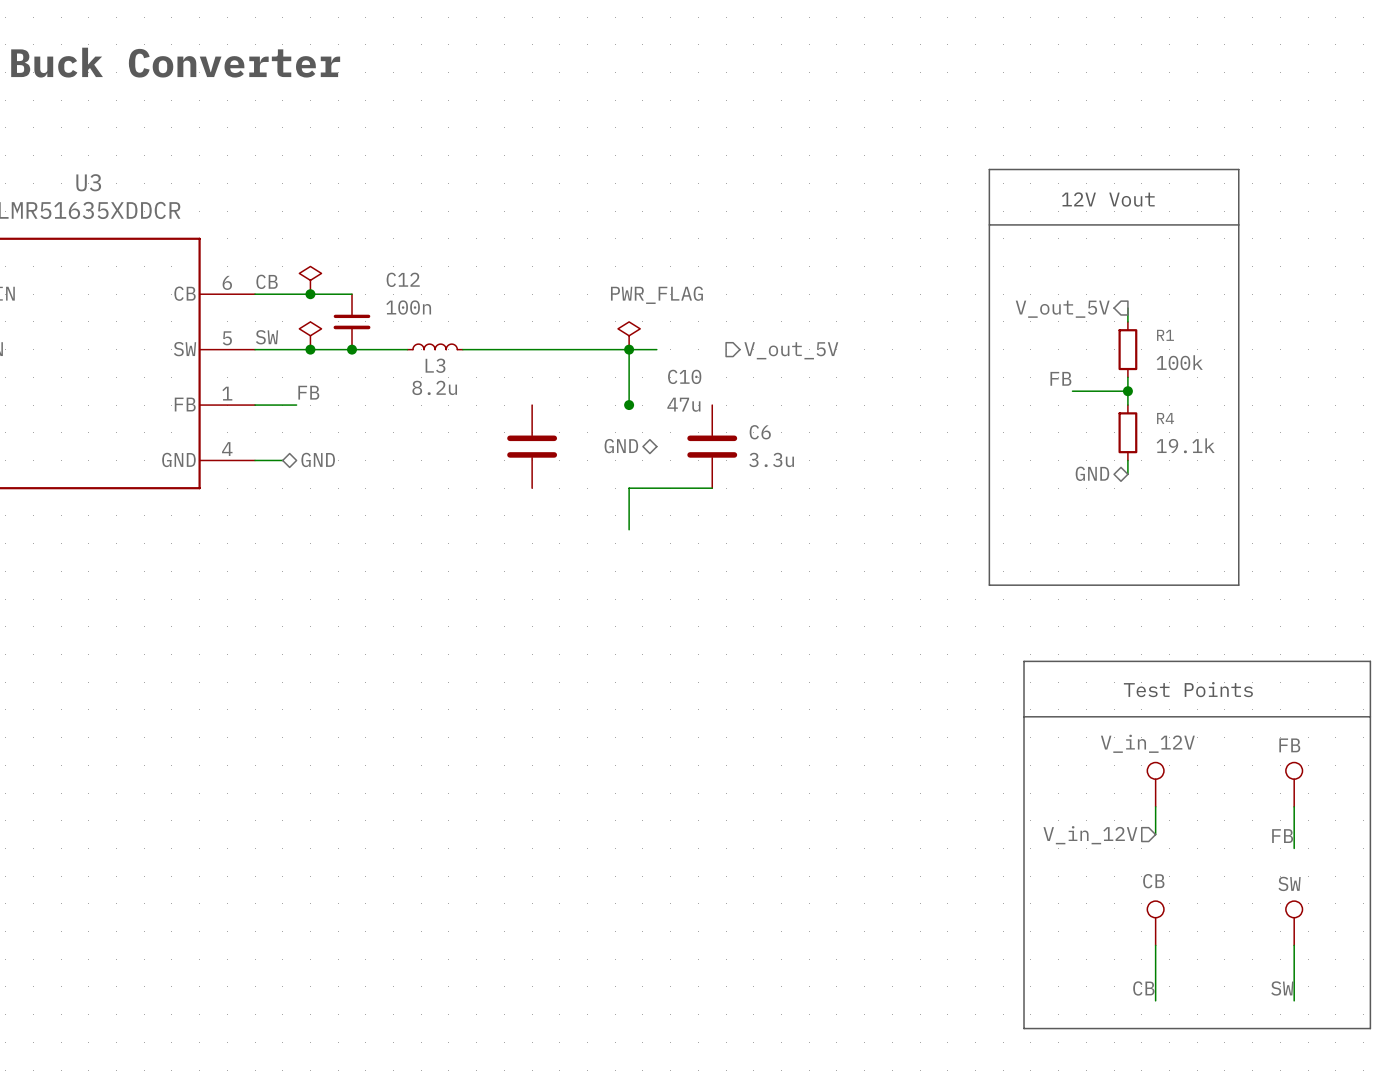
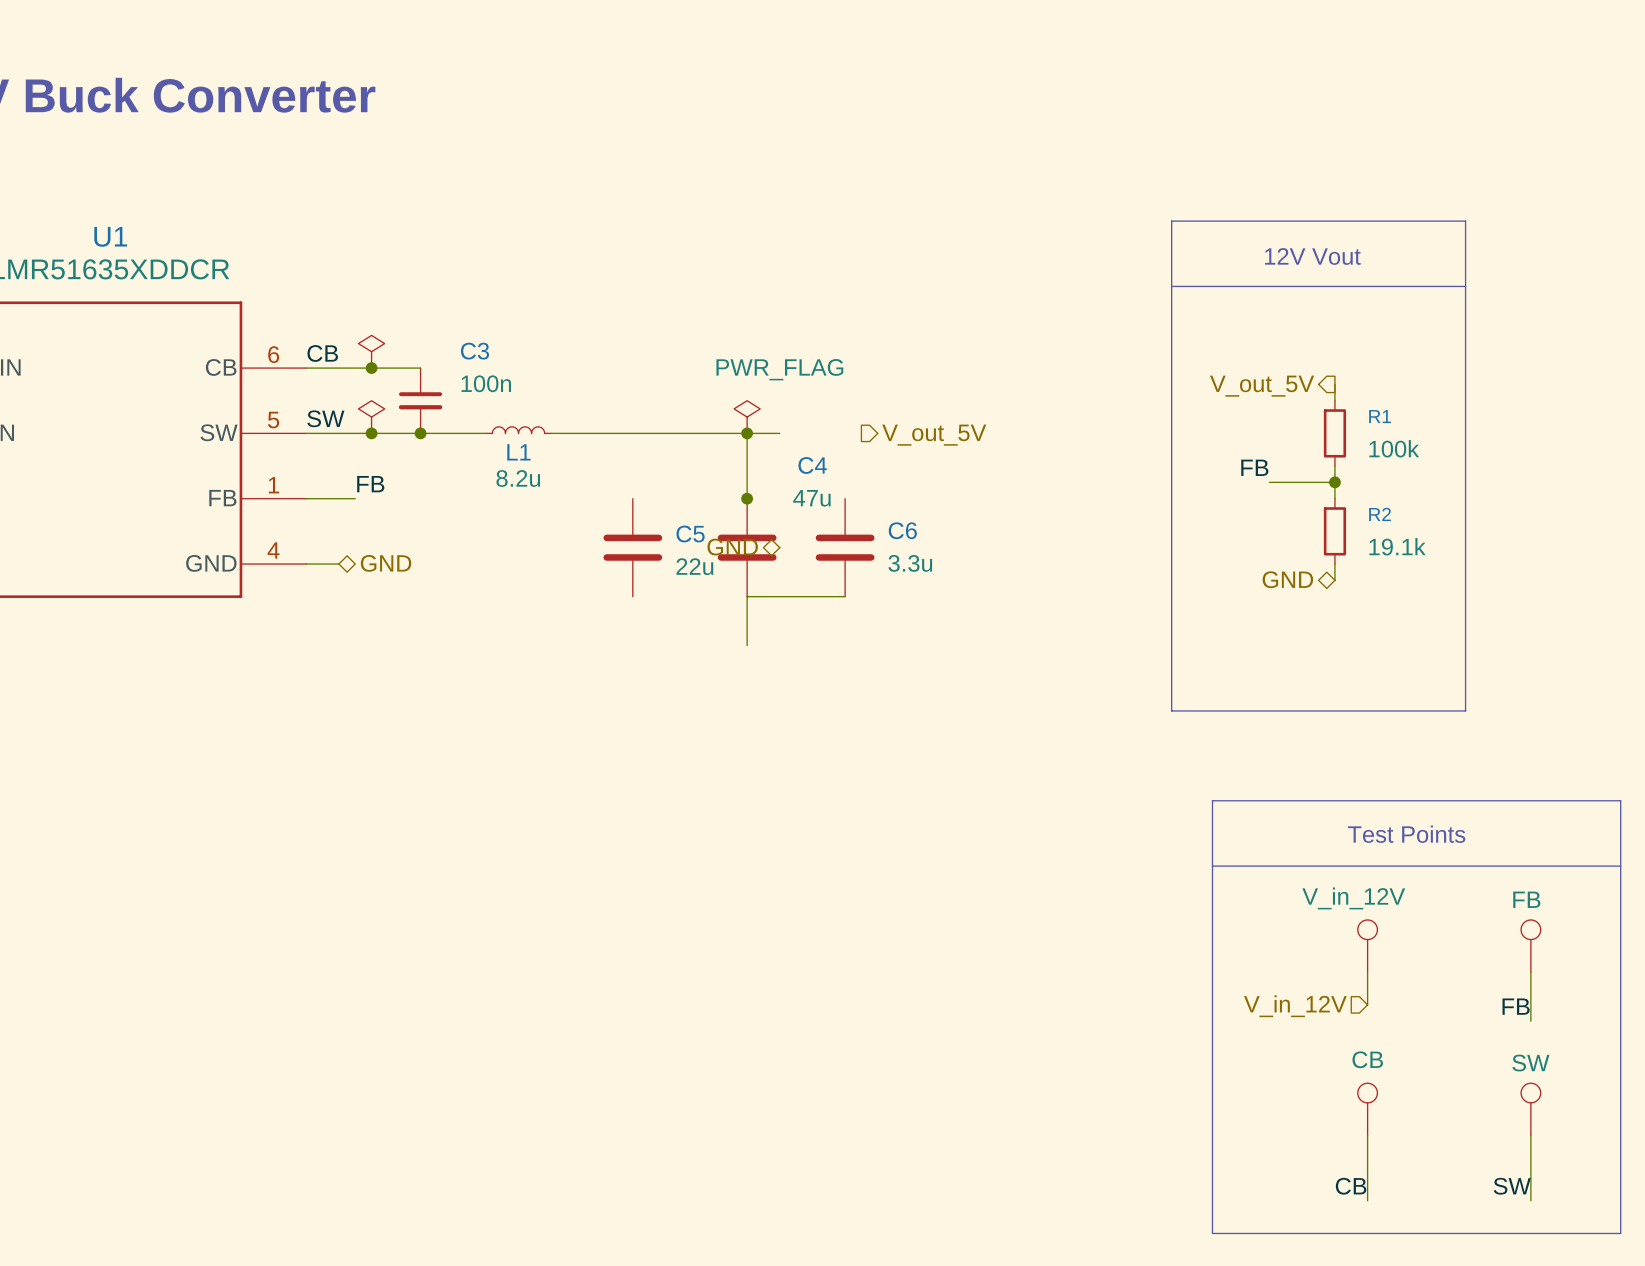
U3 name: U3 (88, 182) -> U1 (110, 236)
C12 name: C12 (403, 279) -> C3 (475, 351)
L3 name: L3 (435, 365) -> L1 (518, 452)
C10 name: C10 (684, 376) -> C4 (812, 465)
R4 name: R4 (1165, 418) -> R2 (1380, 514)
C5: none -> 22u (747, 547)

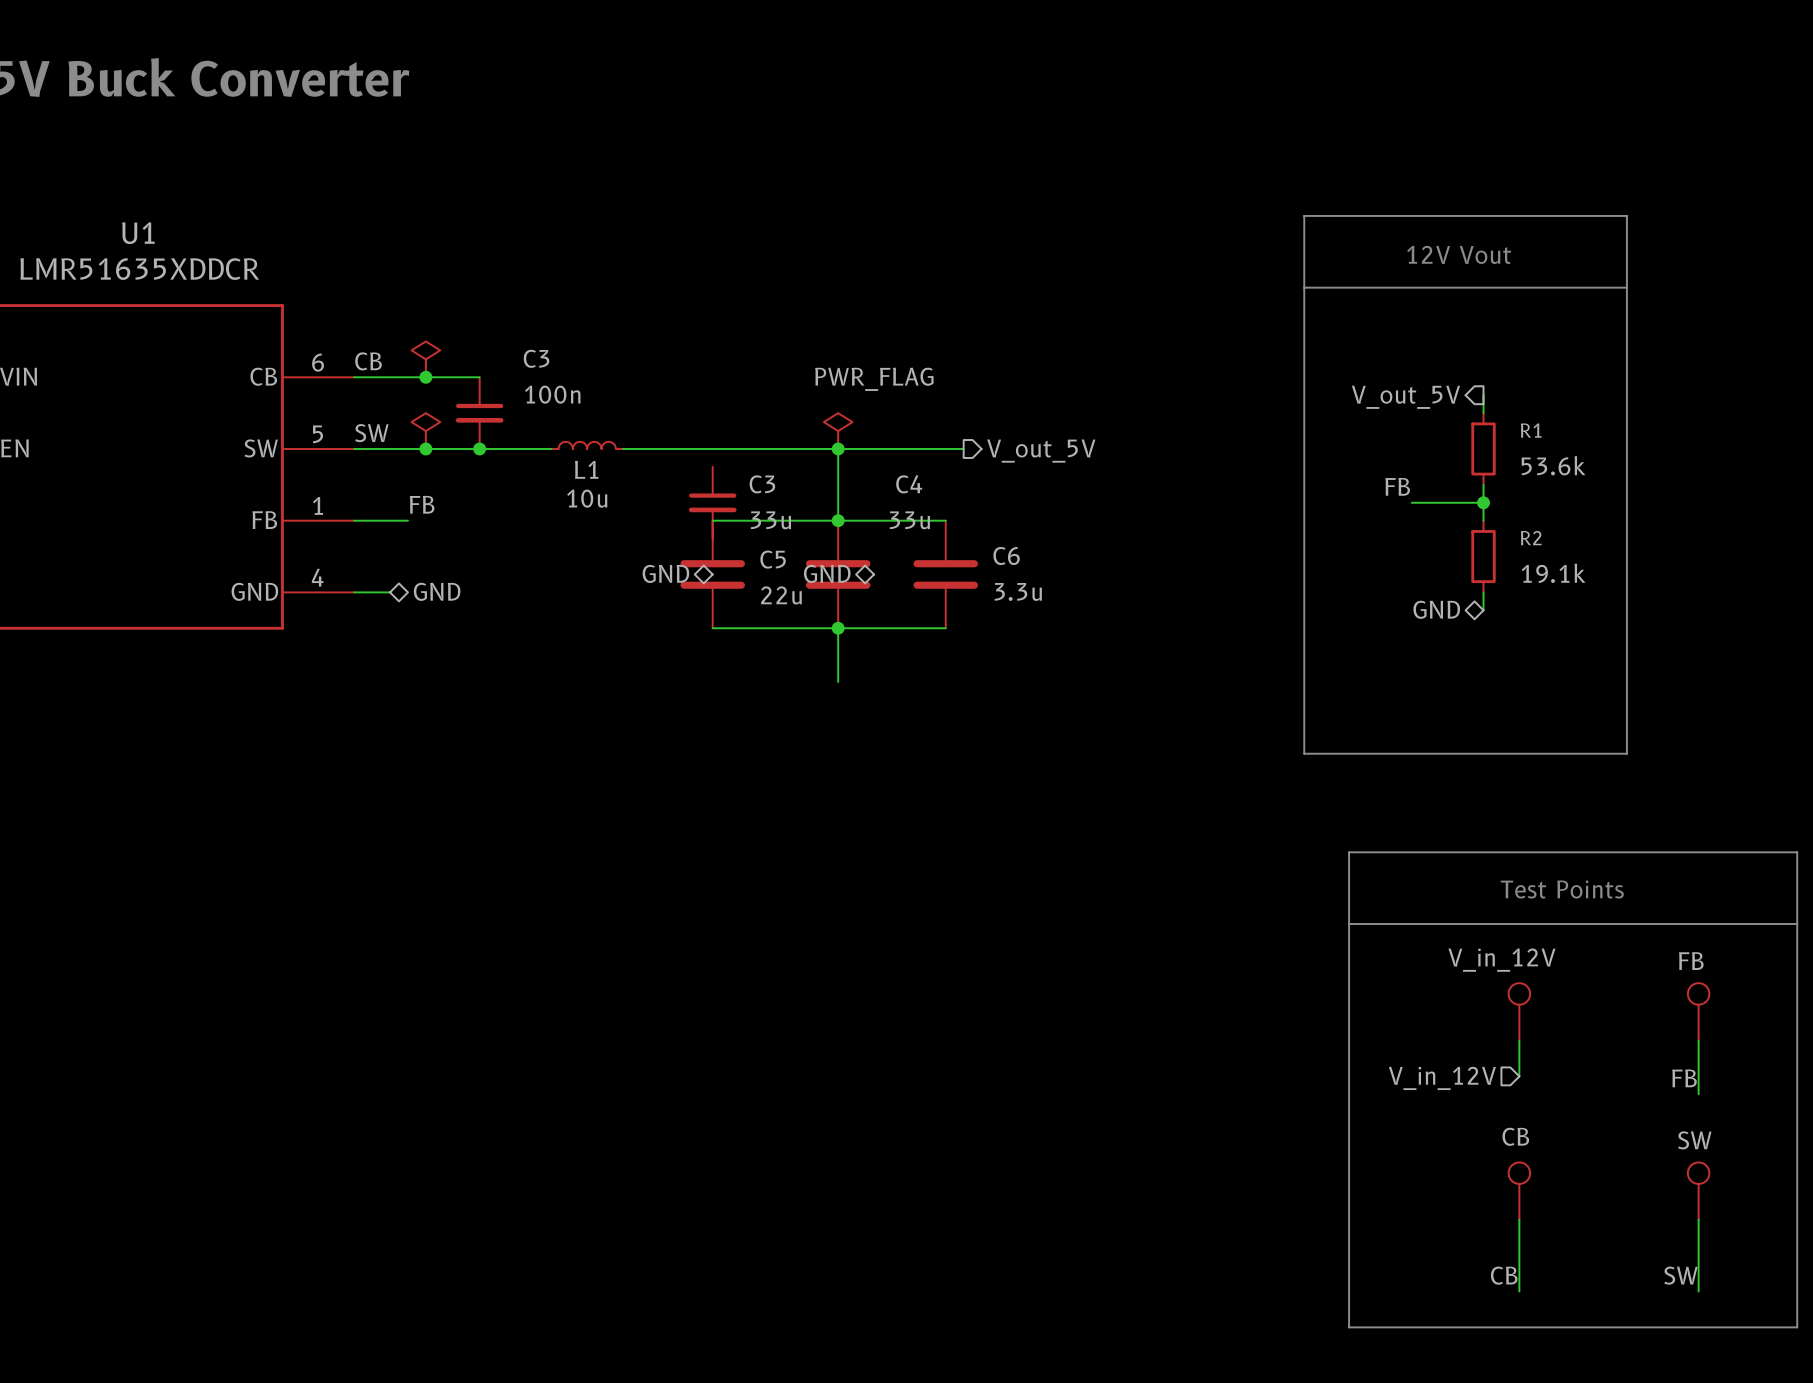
power symbol: 47u (747, 417) -> 33u (838, 431)
wire: none -> (874, 448) (963, 448)
R1 value: 100k (1394, 448) -> 53.6k (1553, 465)
L1 value: 8.2u (518, 478) -> 10u (587, 498)
C3: none -> 33u (712, 502)
wire: none -> (712, 520) (945, 520)
hierarchical label: none -> GND (665, 573)
wire: none -> (712, 628) (838, 628)
junction: none -> (838, 628)

